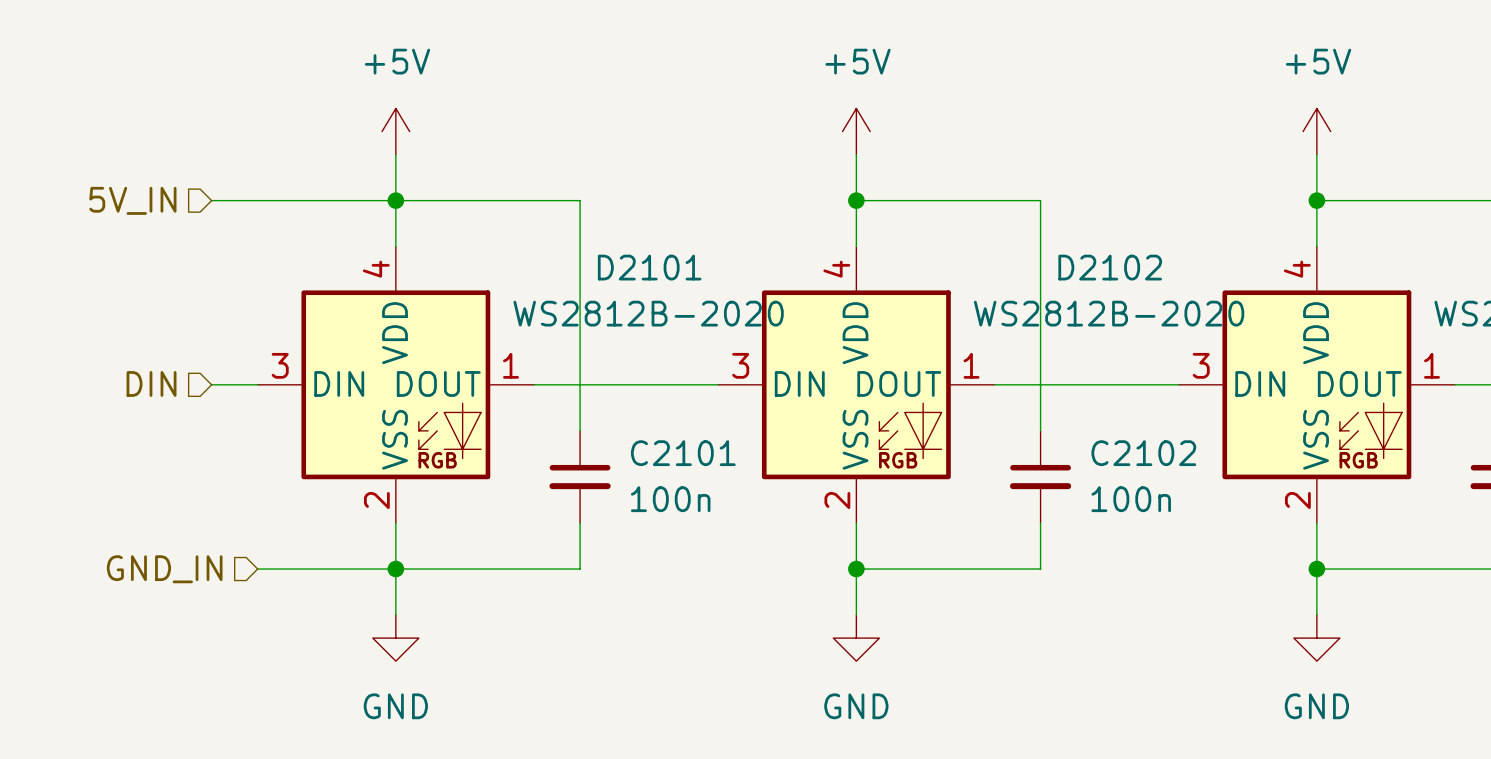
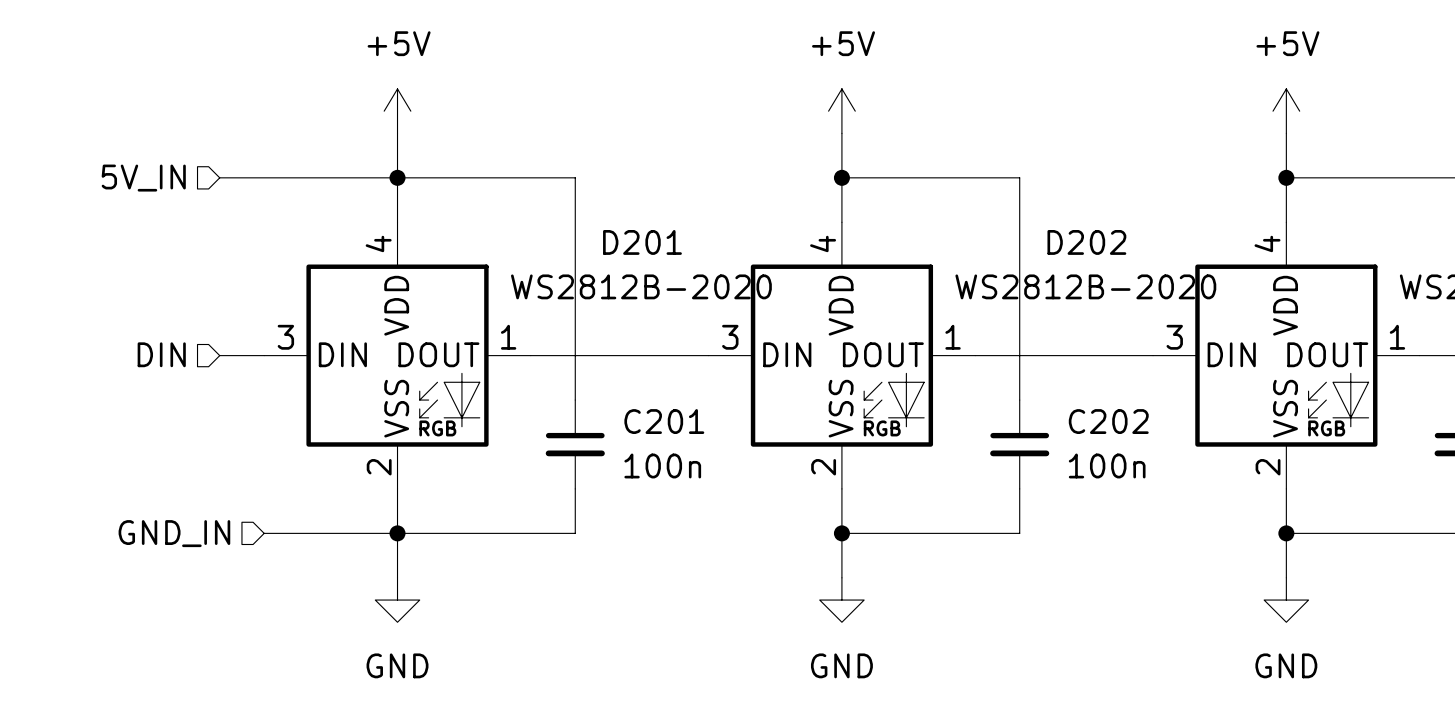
D2101 name: D2101 (649, 267) -> D201 (642, 242)
D2102 name: D2102 (1110, 267) -> D202 (1086, 242)
C2101 name: C2101 (683, 453) -> C201 (664, 421)
C2102 name: C2102 (1143, 453) -> C202 (1108, 421)

